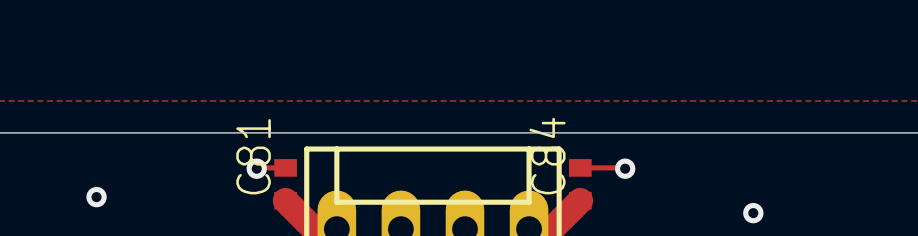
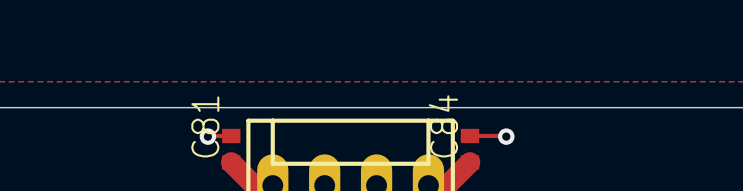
via: (96, 197) -> none
via: (753, 213) -> none

